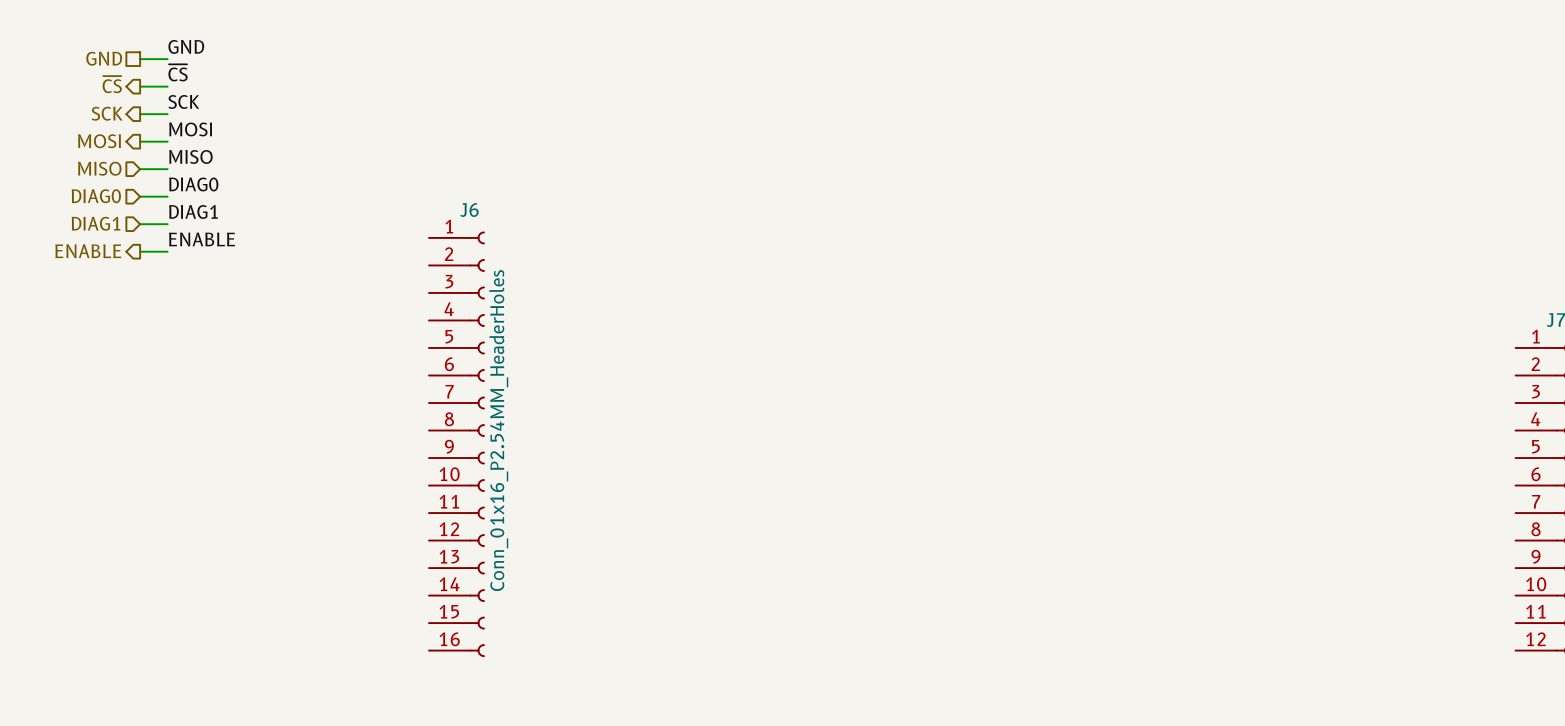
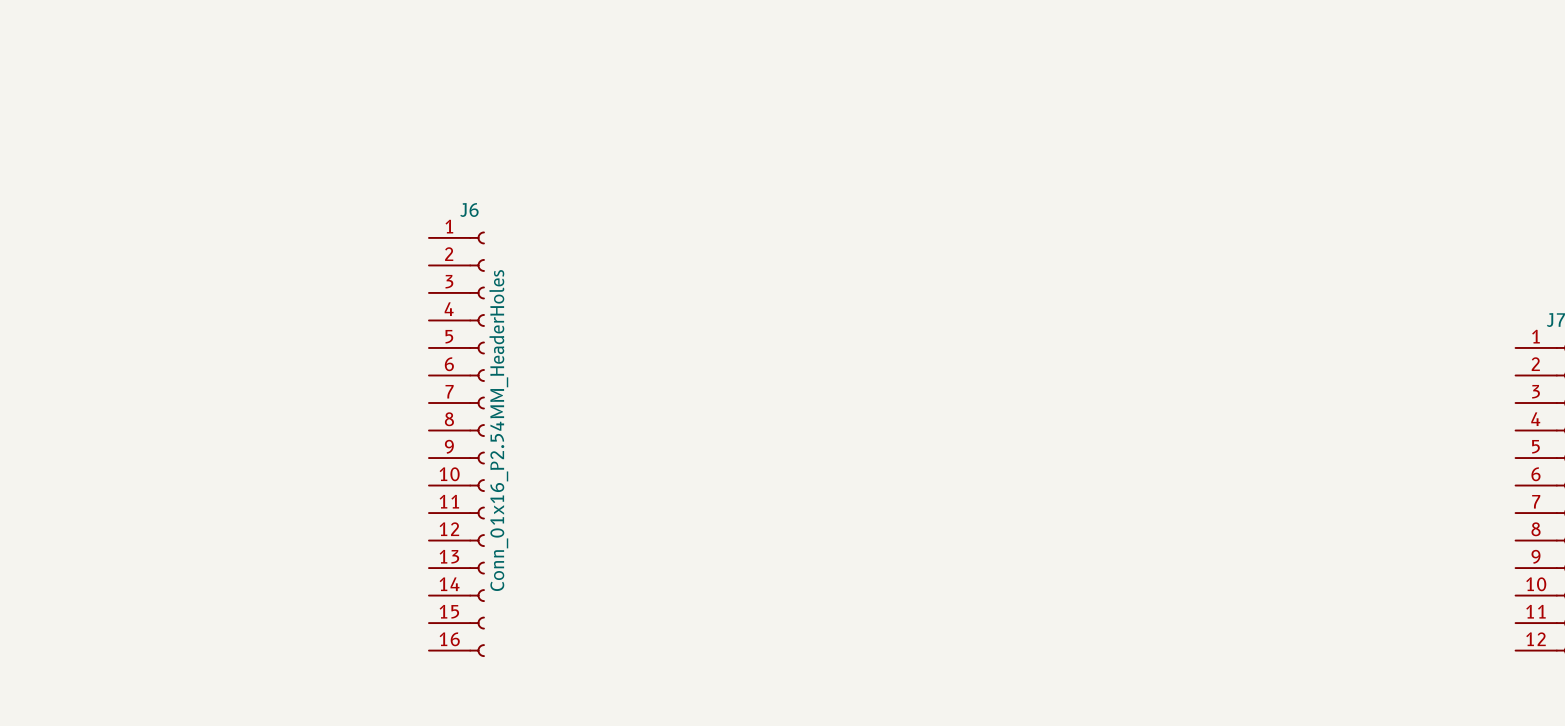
label: GND (186, 46) -> none
hierarchical label: GND (104, 58) -> none
wire: (140, 59) (167, 59) -> none
label: ~{CS} (178, 72) -> none
hierarchical label: ~{CS} (112, 84) -> none
wire: (140, 86) (167, 86) -> none
label: SCK (183, 101) -> none
hierarchical label: SCK (107, 113) -> none
wire: (140, 114) (167, 114) -> none
label: MOSI (190, 129) -> none
hierarchical label: MOSI (99, 141) -> none
wire: (140, 141) (167, 141) -> none
label: MISO (190, 156) -> none
hierarchical label: MISO (99, 168) -> none
wire: (140, 169) (167, 169) -> none
label: DIAG0 (193, 184) -> none
hierarchical label: DIAG0 (96, 196) -> none
wire: (140, 196) (167, 196) -> none
label: DIAG1 (193, 211) -> none
hierarchical label: DIAG1 (96, 223) -> none
wire: (140, 224) (167, 224) -> none
label: ENABLE (202, 239) -> none
hierarchical label: ENABLE (88, 251) -> none
wire: (140, 251) (167, 251) -> none

